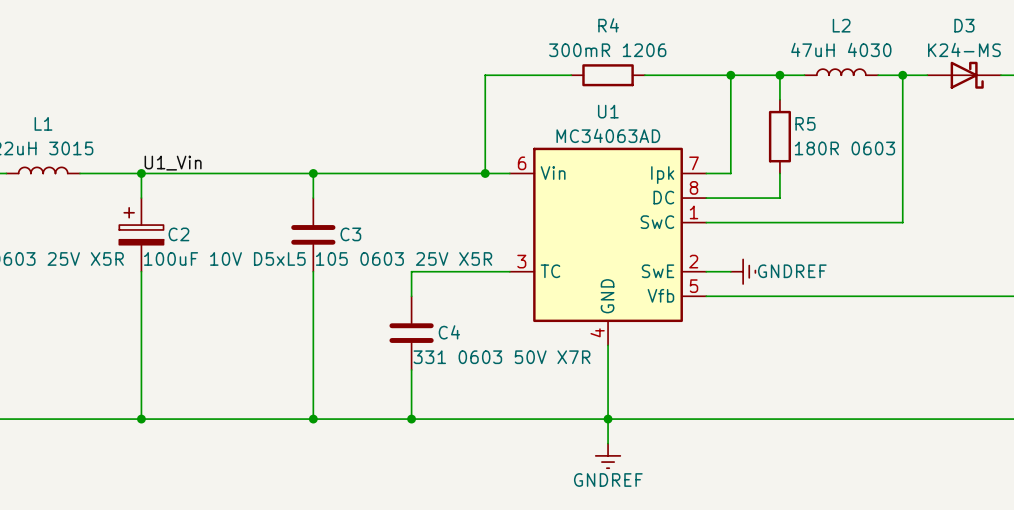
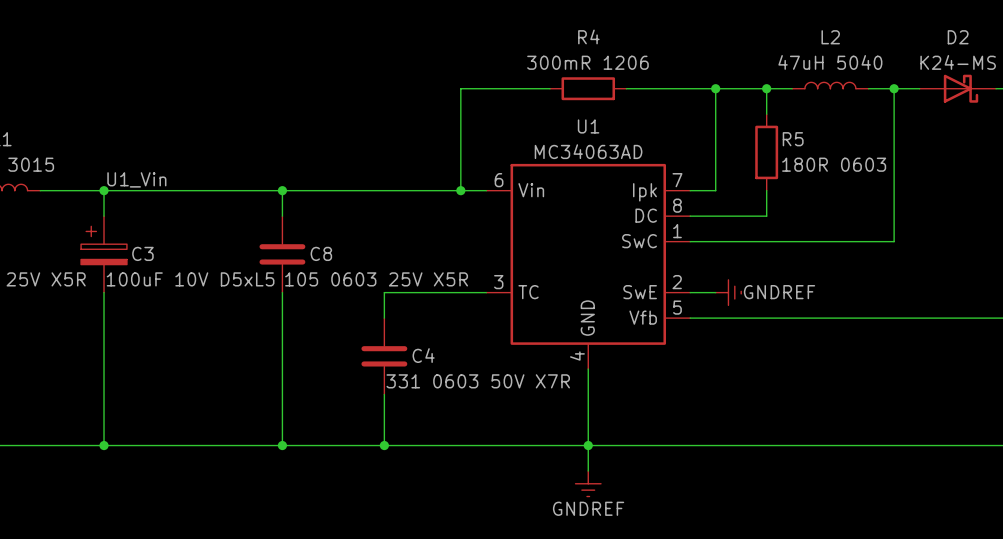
D3 name: D3 (964, 25) -> D2 (958, 37)
L2 value: 47uH 4030 (841, 49) -> 47uH 5040 (830, 62)
C2 name: C2 (178, 234) -> C3 (142, 253)
C3 name: C3 (350, 234) -> C8 (321, 253)

